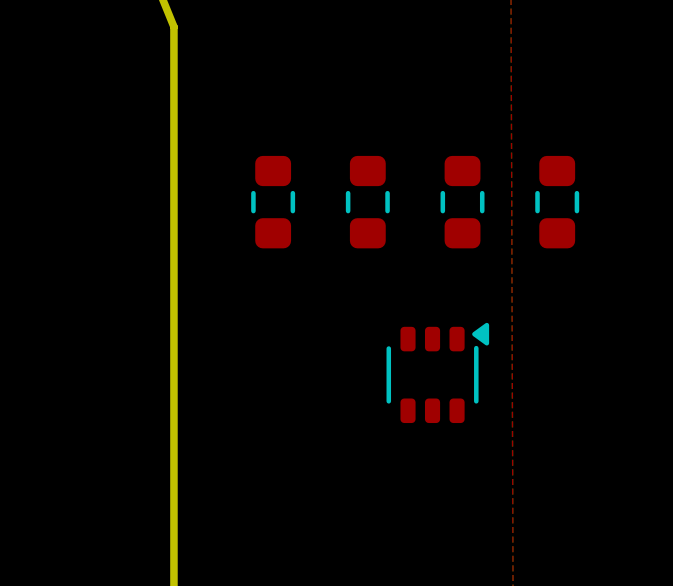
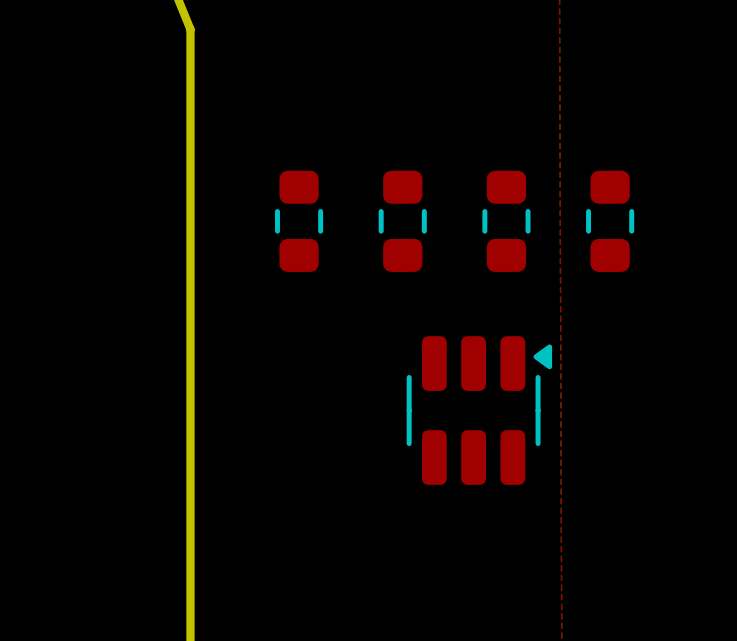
part footprint: [386, 322, 490, 424] -> [406, 336, 553, 485]

